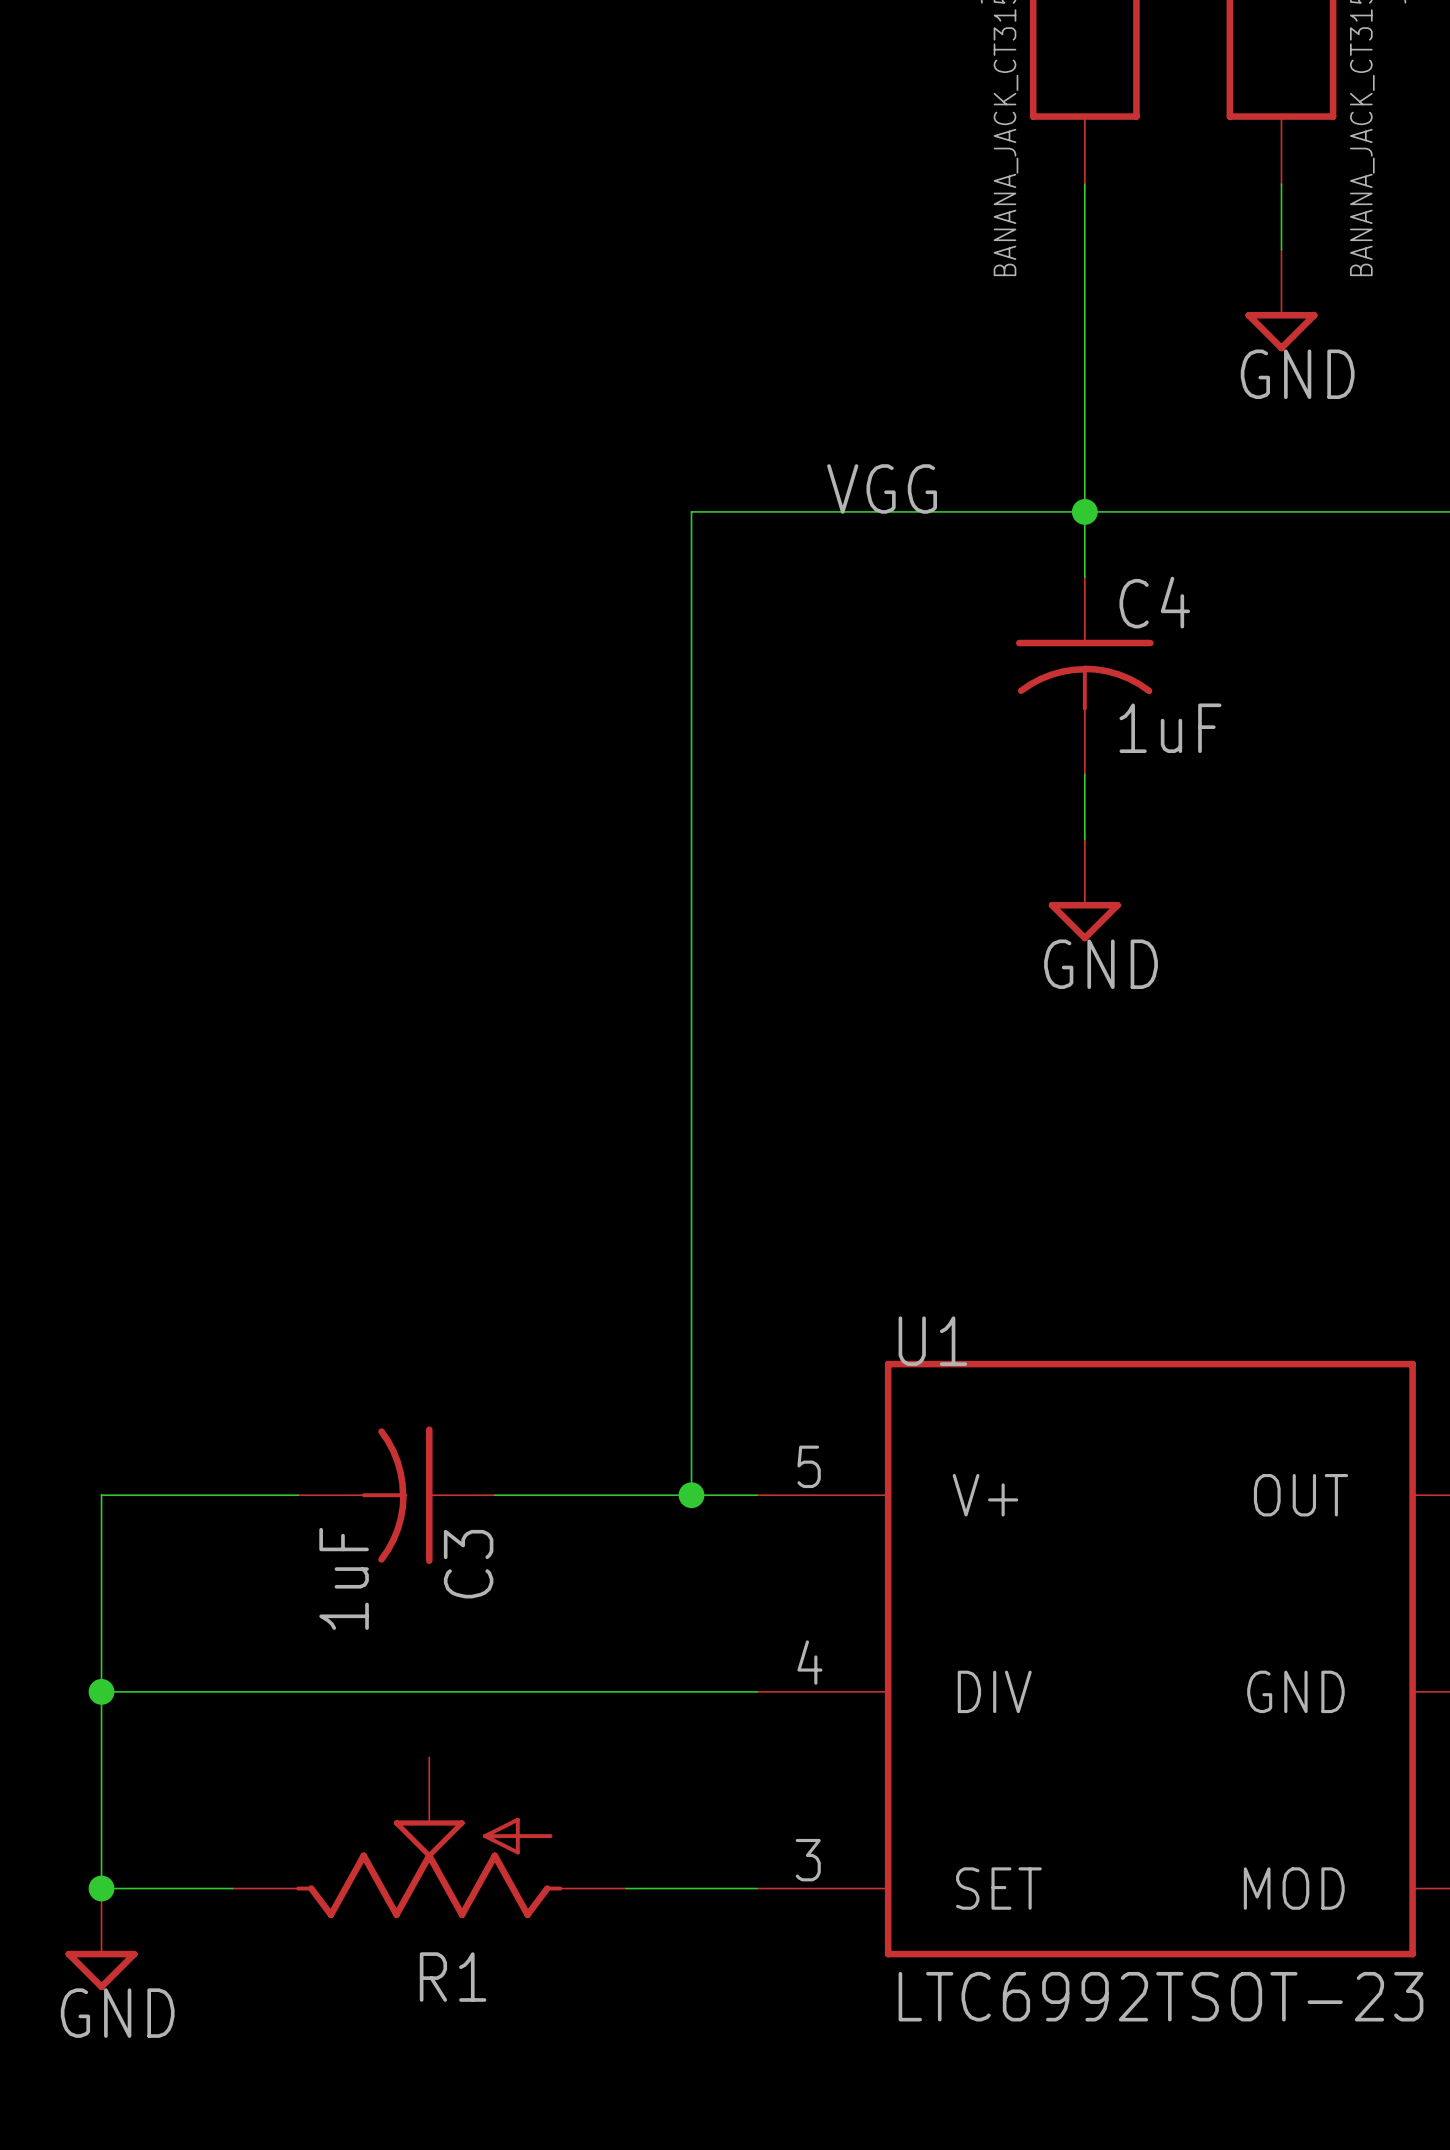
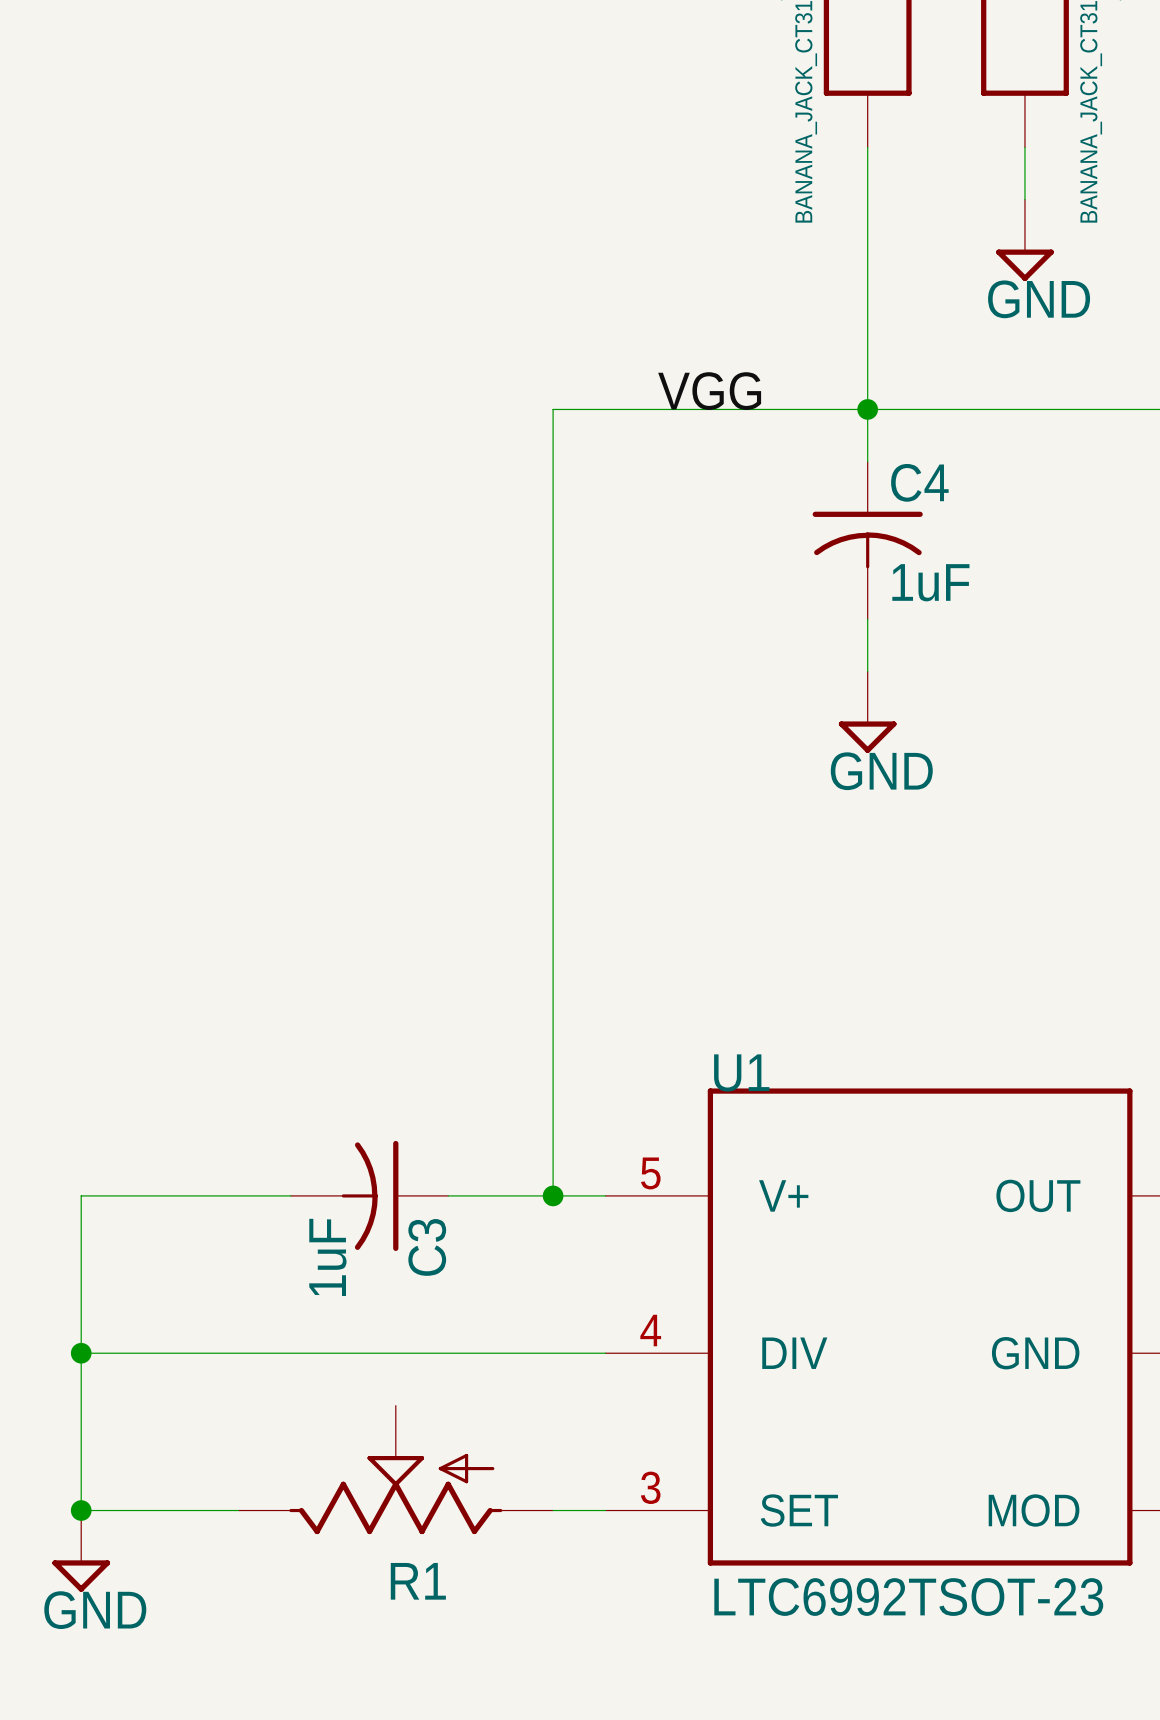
C3 position: (396, 1495) -> (369, 1195)
R1 position: (429, 1837) -> (395, 1469)

